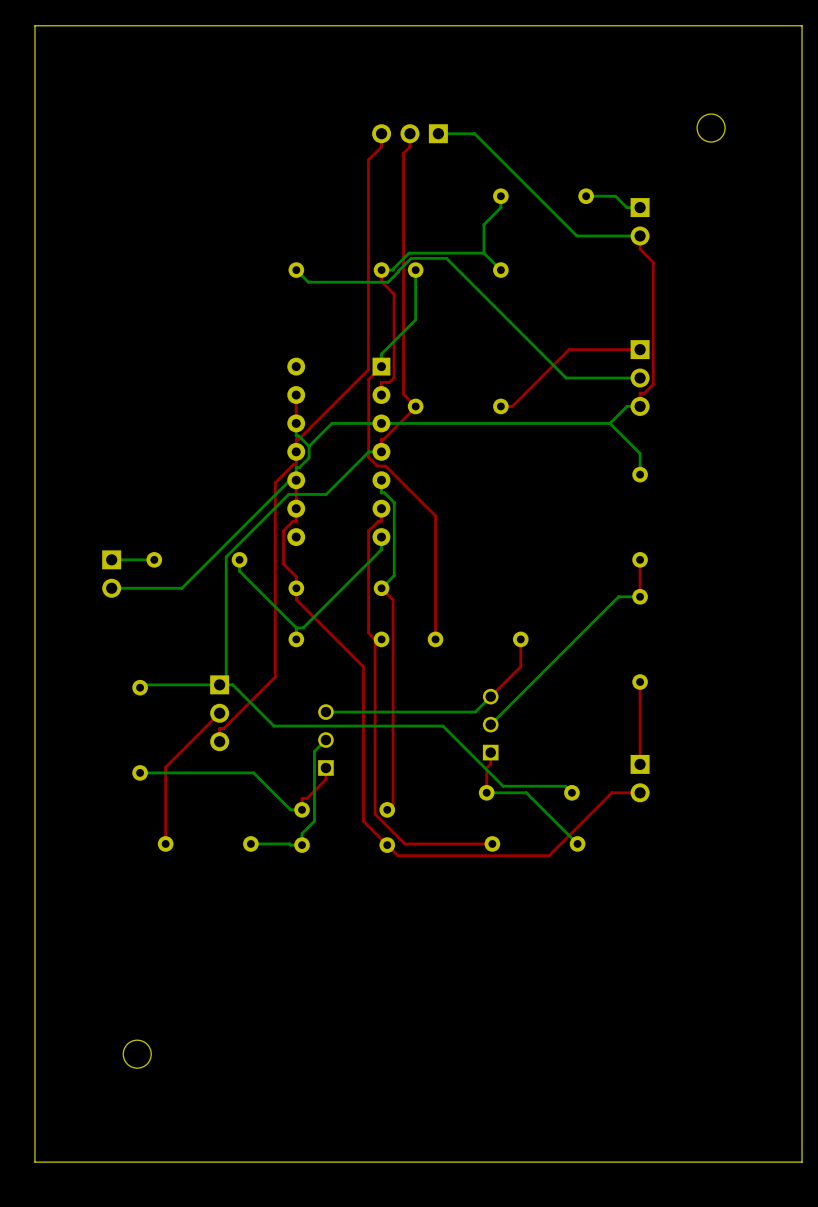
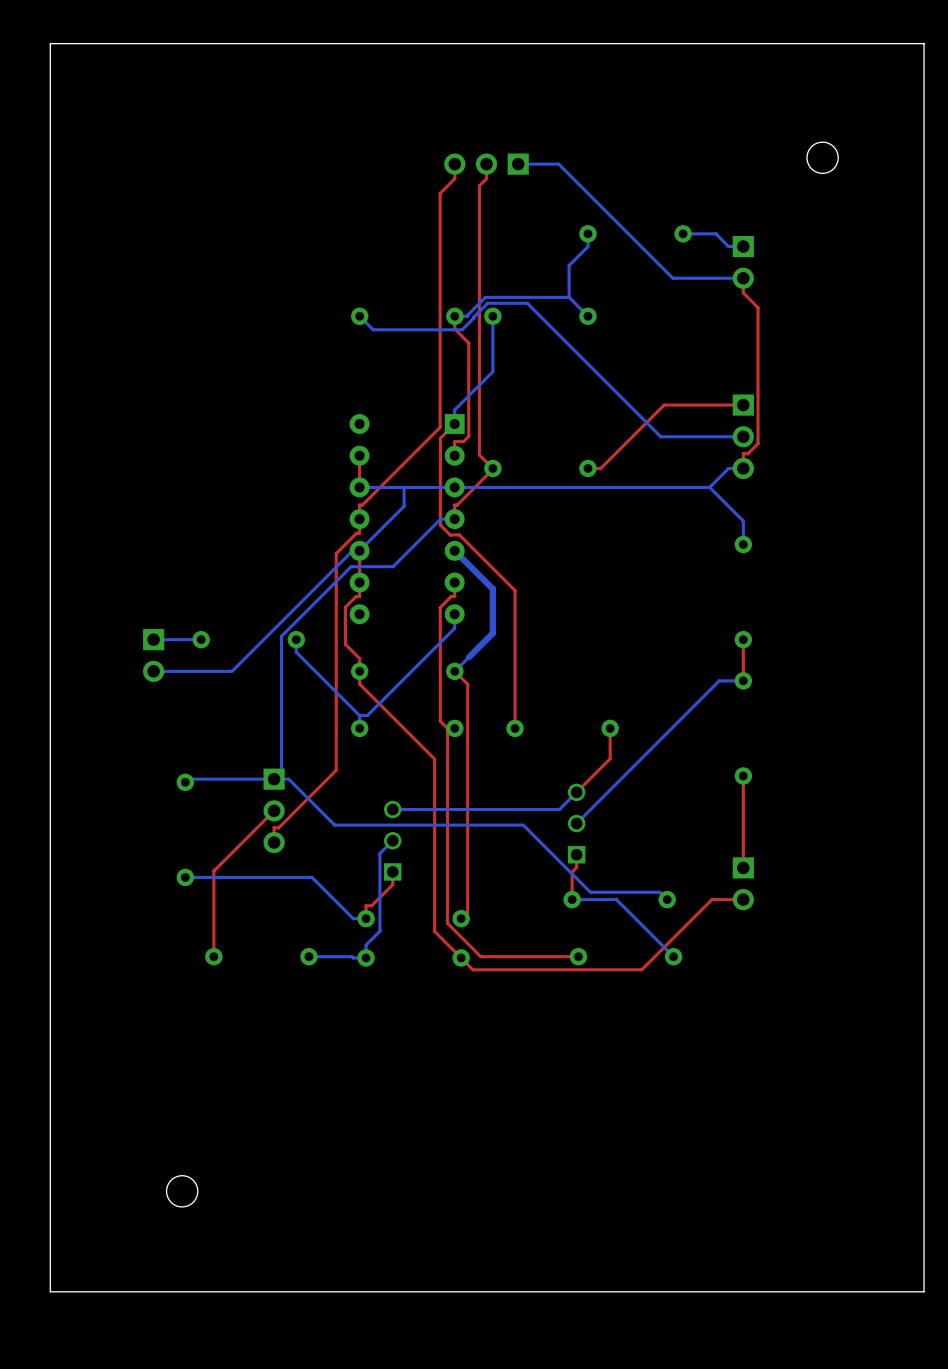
board edge: (34, 25) (34, 1162) (802, 1162) (802, 1144) -> (68, 43) (50, 43) (50, 1291) (924, 1291)
bottom track: (296, 423) (296, 436) (298, 436) (309, 446) -> none
bottom track: (331, 423) (309, 446) -> (399, 487) (359, 487)
bottom track: none -> (404, 487) (404, 506) (359, 550)
bottom track: (309, 446) (309, 457) (299, 467) (296, 467) (296, 473) -> none
bottom track: (381, 480) (381, 492) (384, 492) (394, 502) (394, 575) -> (492, 588) (492, 633) (468, 657)
bottom track: none -> (454, 550) (492, 588)

